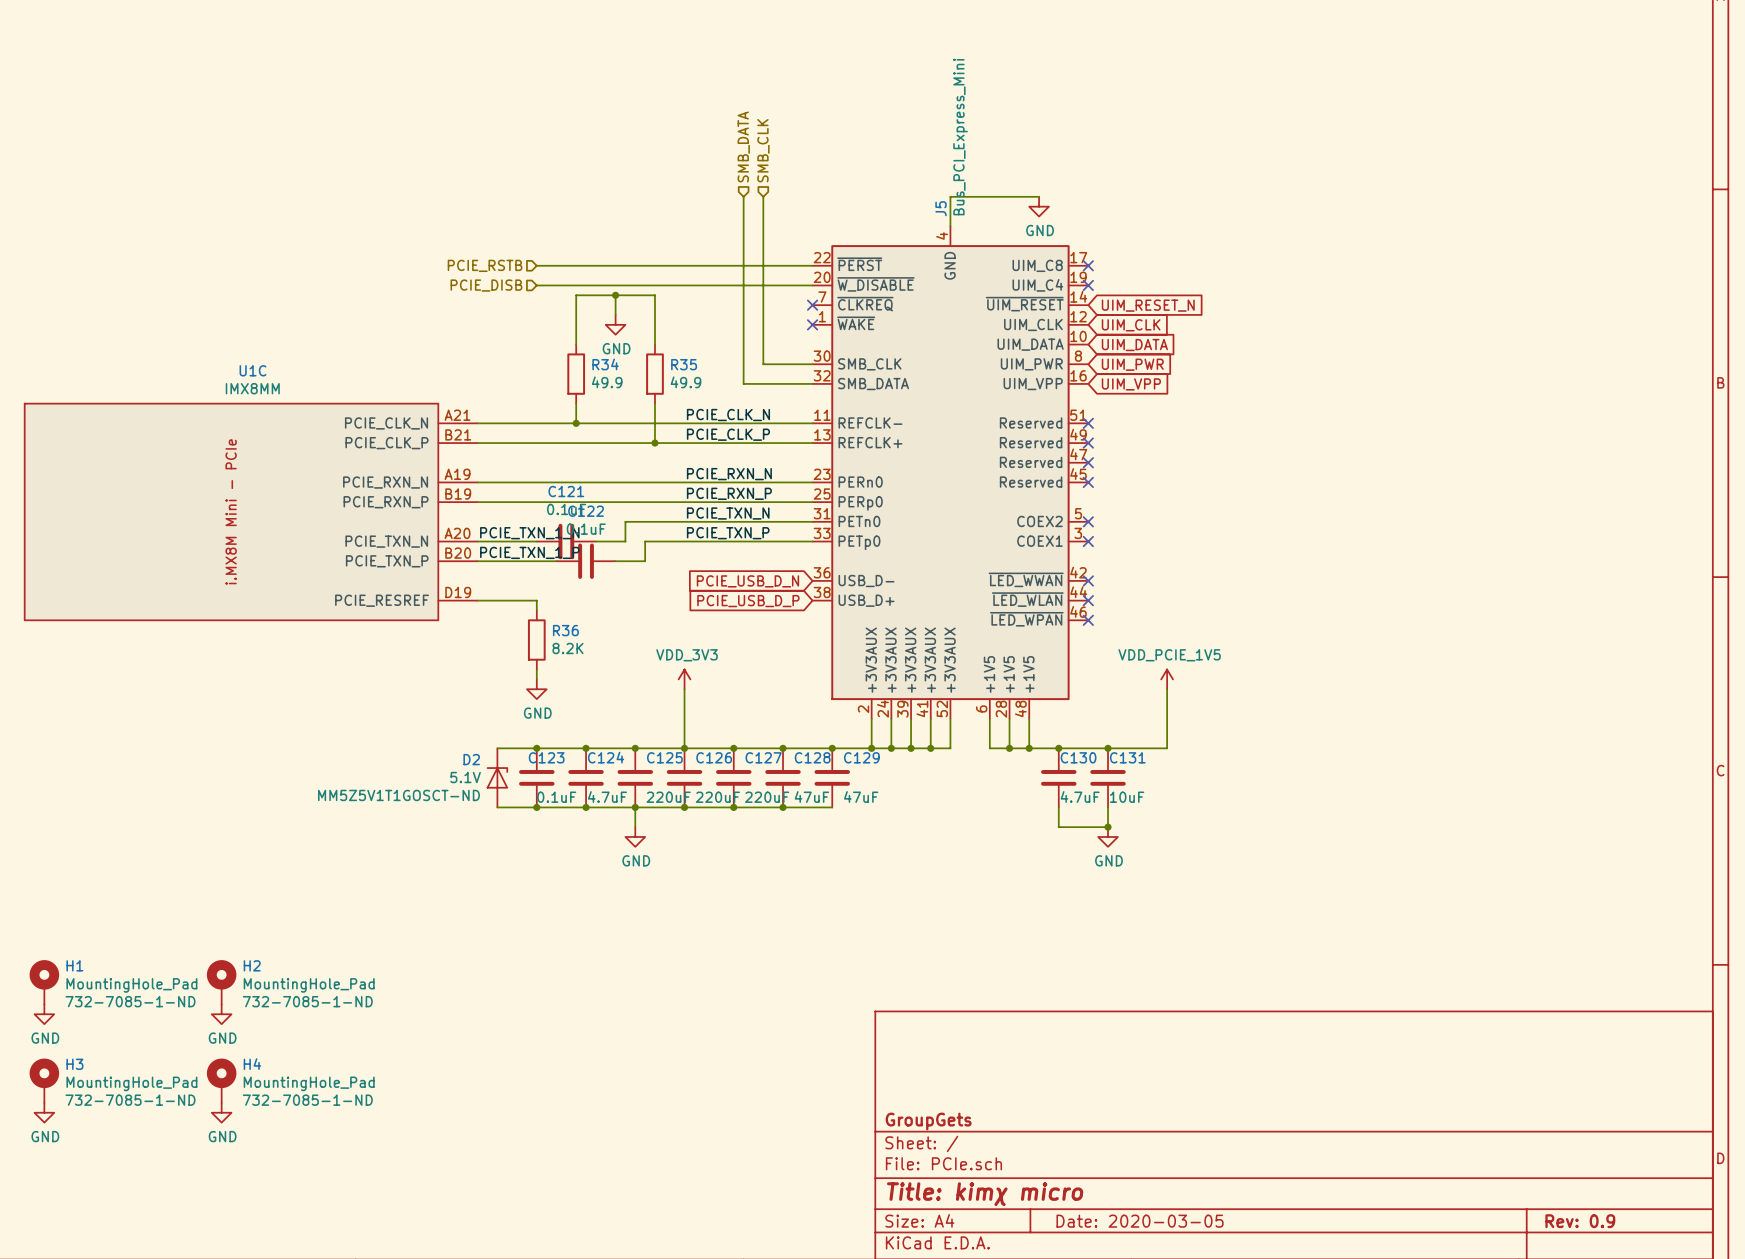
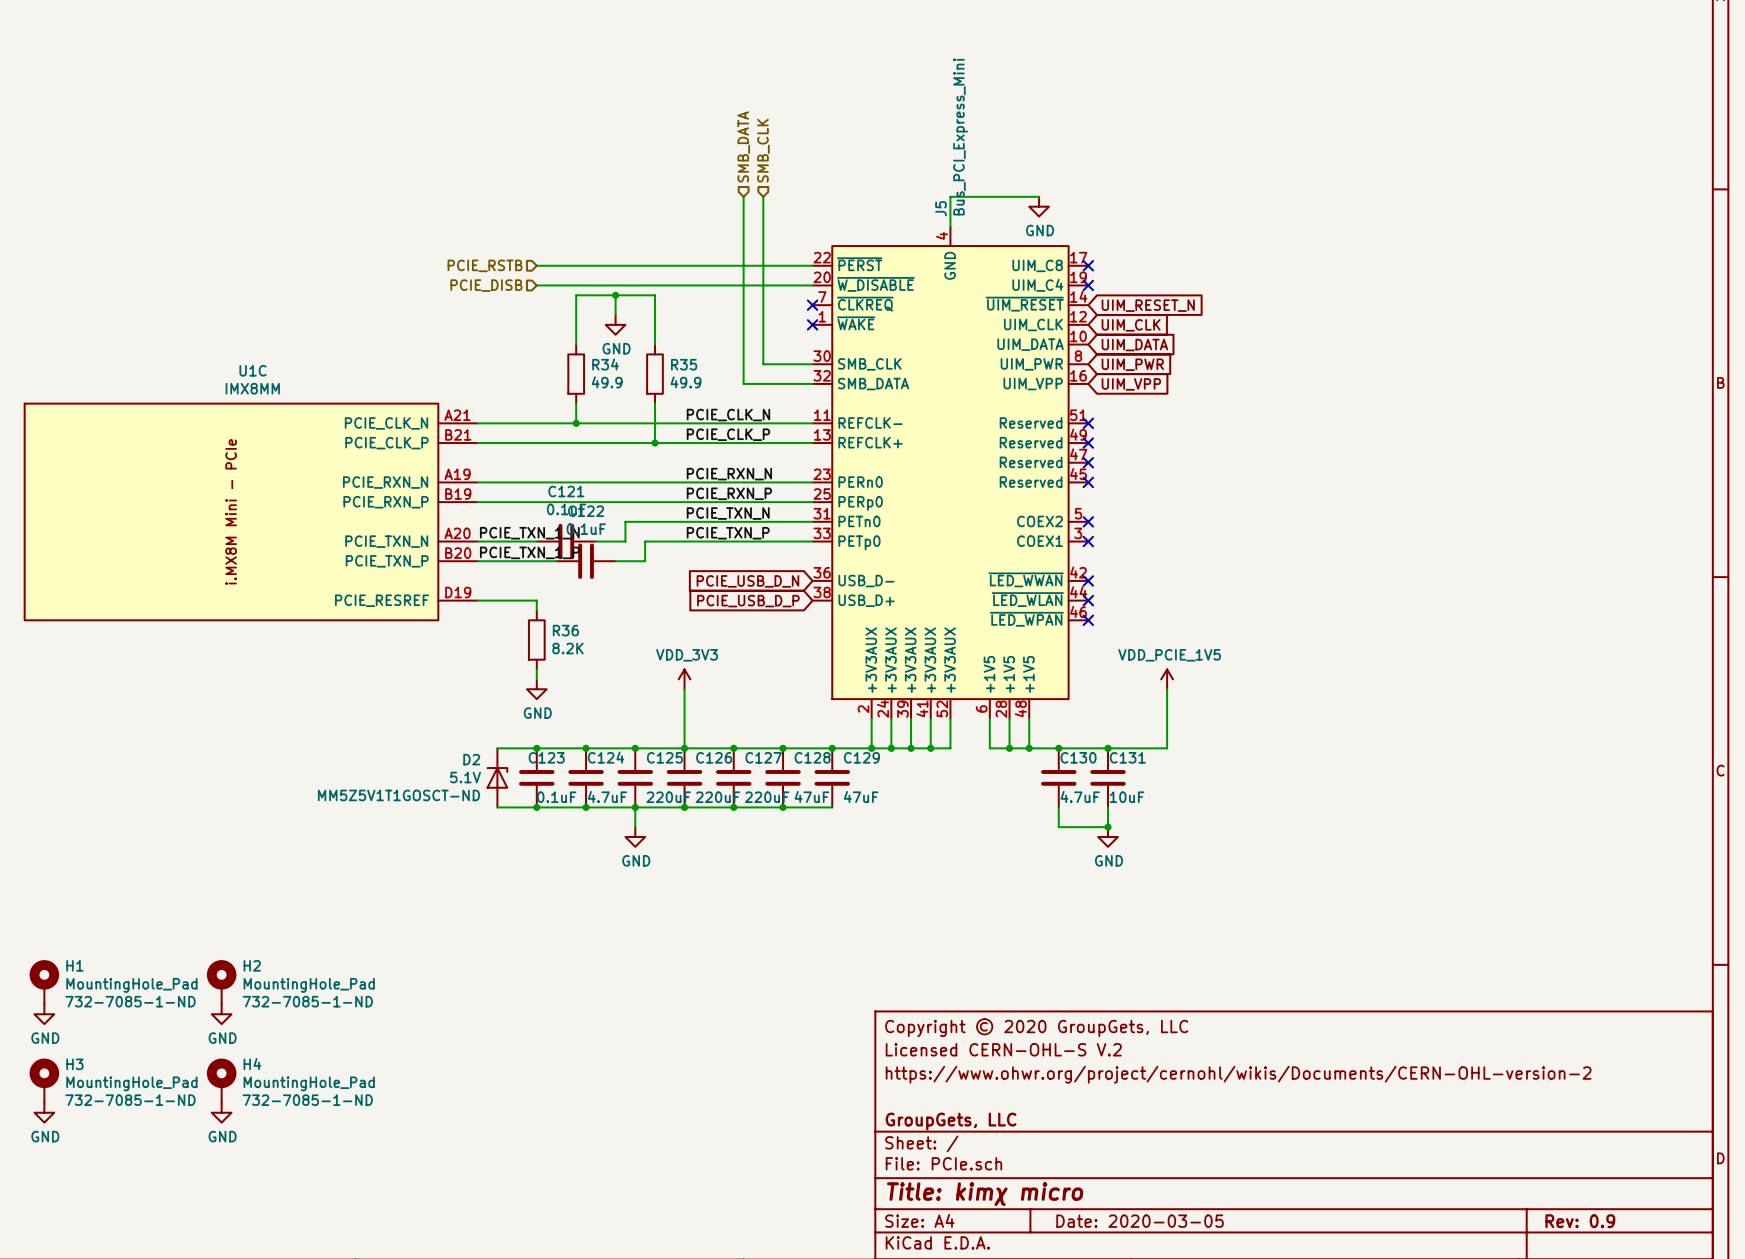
title block: none -> Copyright © 2020 GroupGets, LLC (1036, 1027)
title block: none -> Licensed CERN-OHL-S V.2 (1003, 1049)
title block: none -> https://www.ohwr.org/project/cernohl/wikis/Documents/CERN-OHL-version-2 (1238, 1074)
title block: GroupGets (928, 1121) -> GroupGets, LLC (951, 1121)

